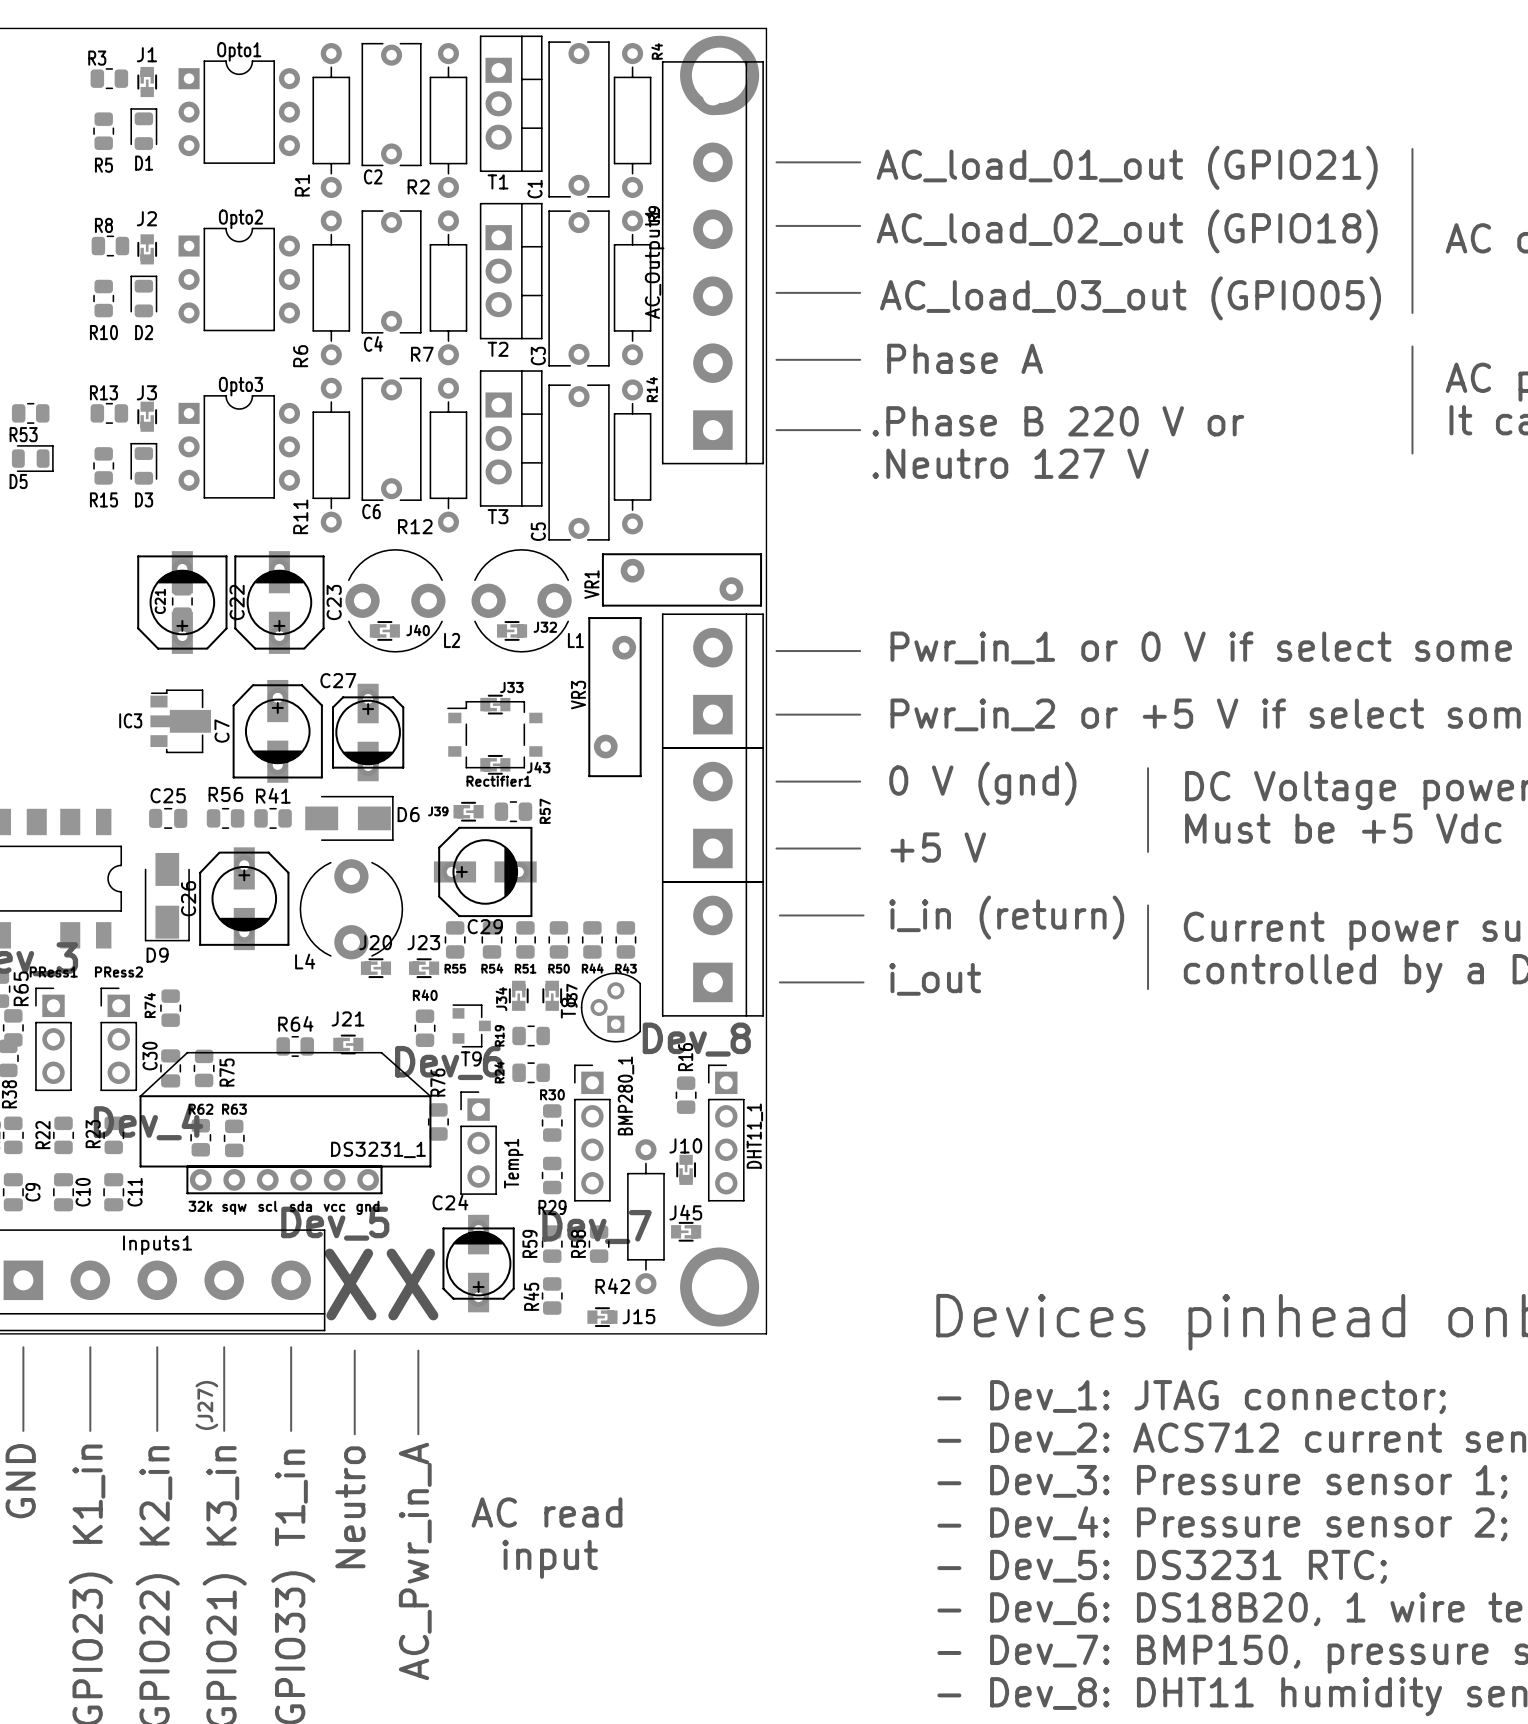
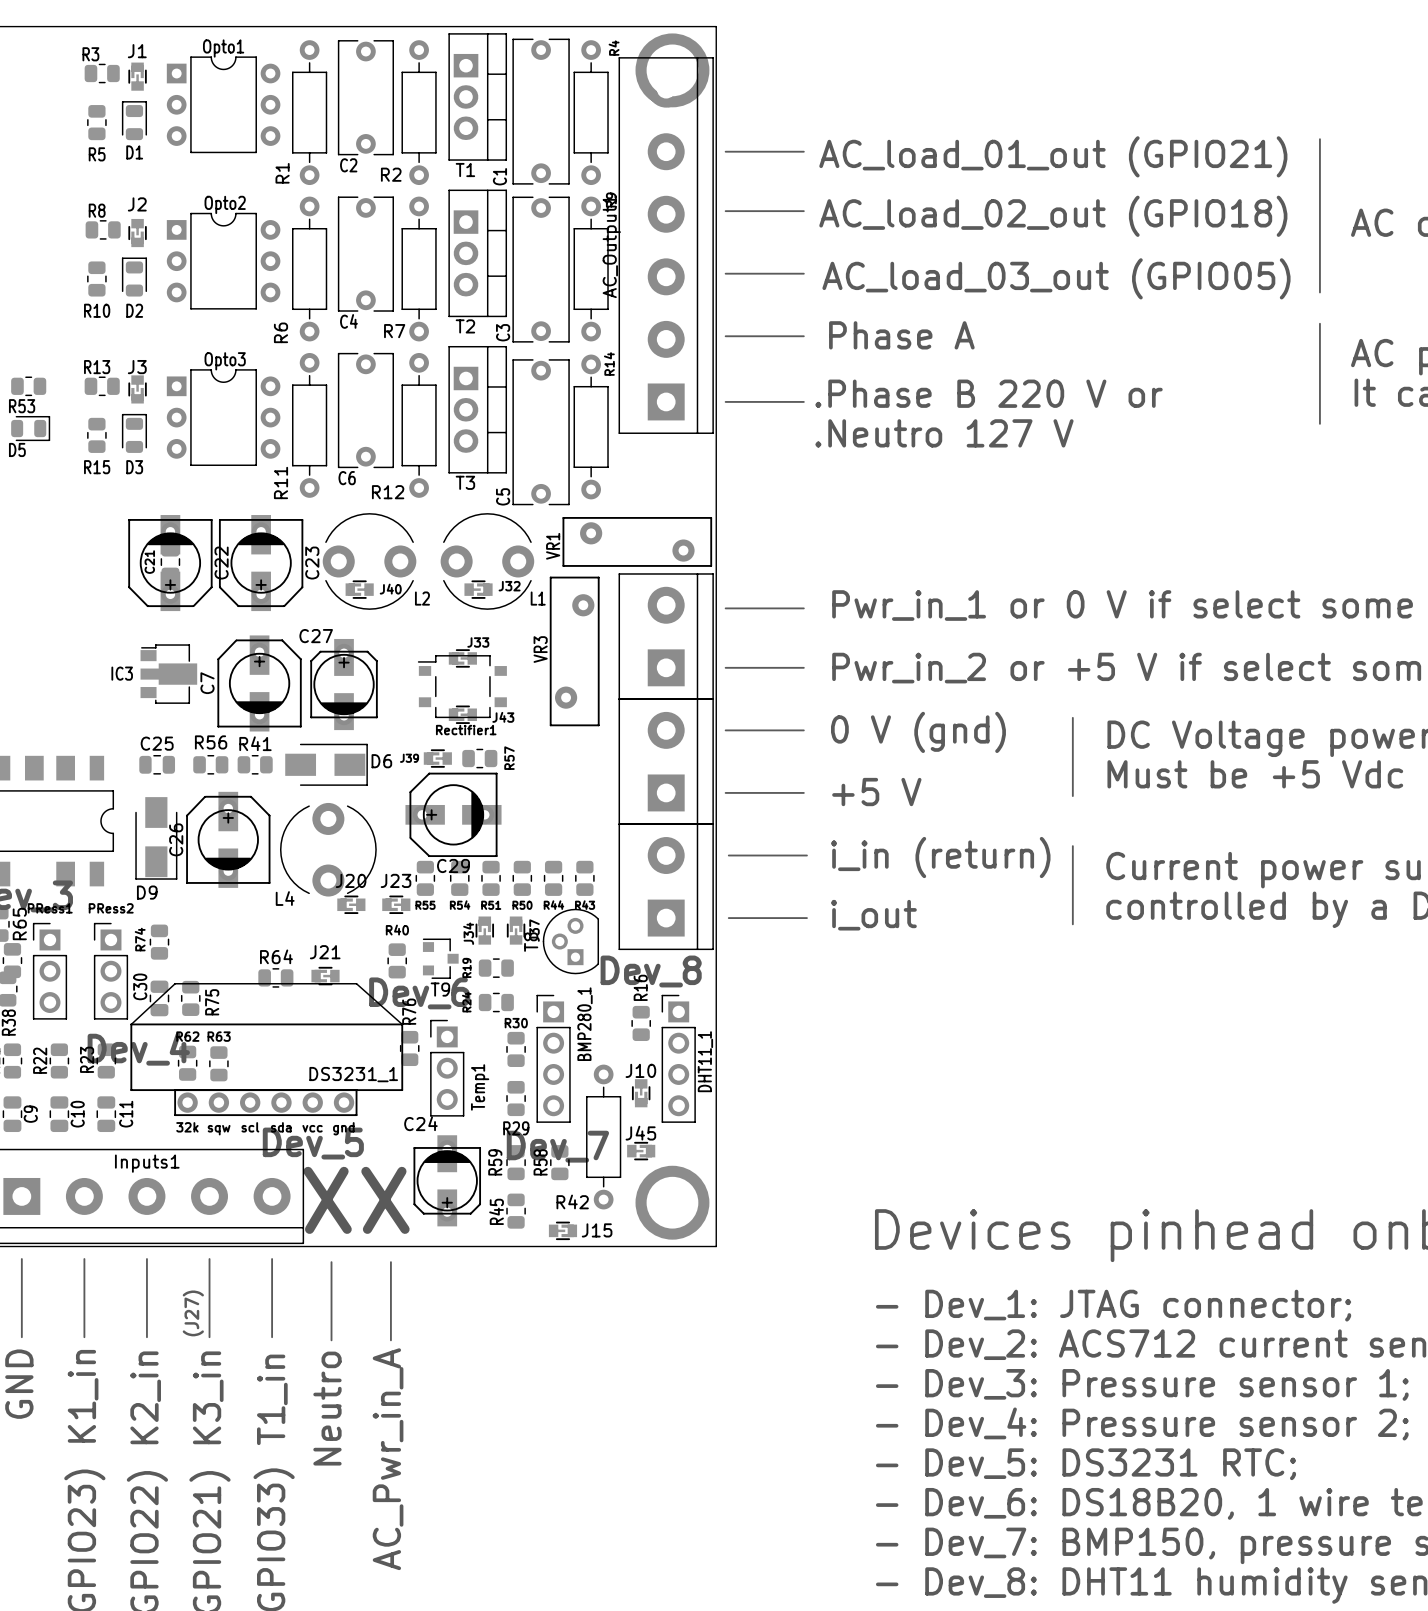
text: AC read (547, 1512) -> none
text: input (550, 1559) -> none

